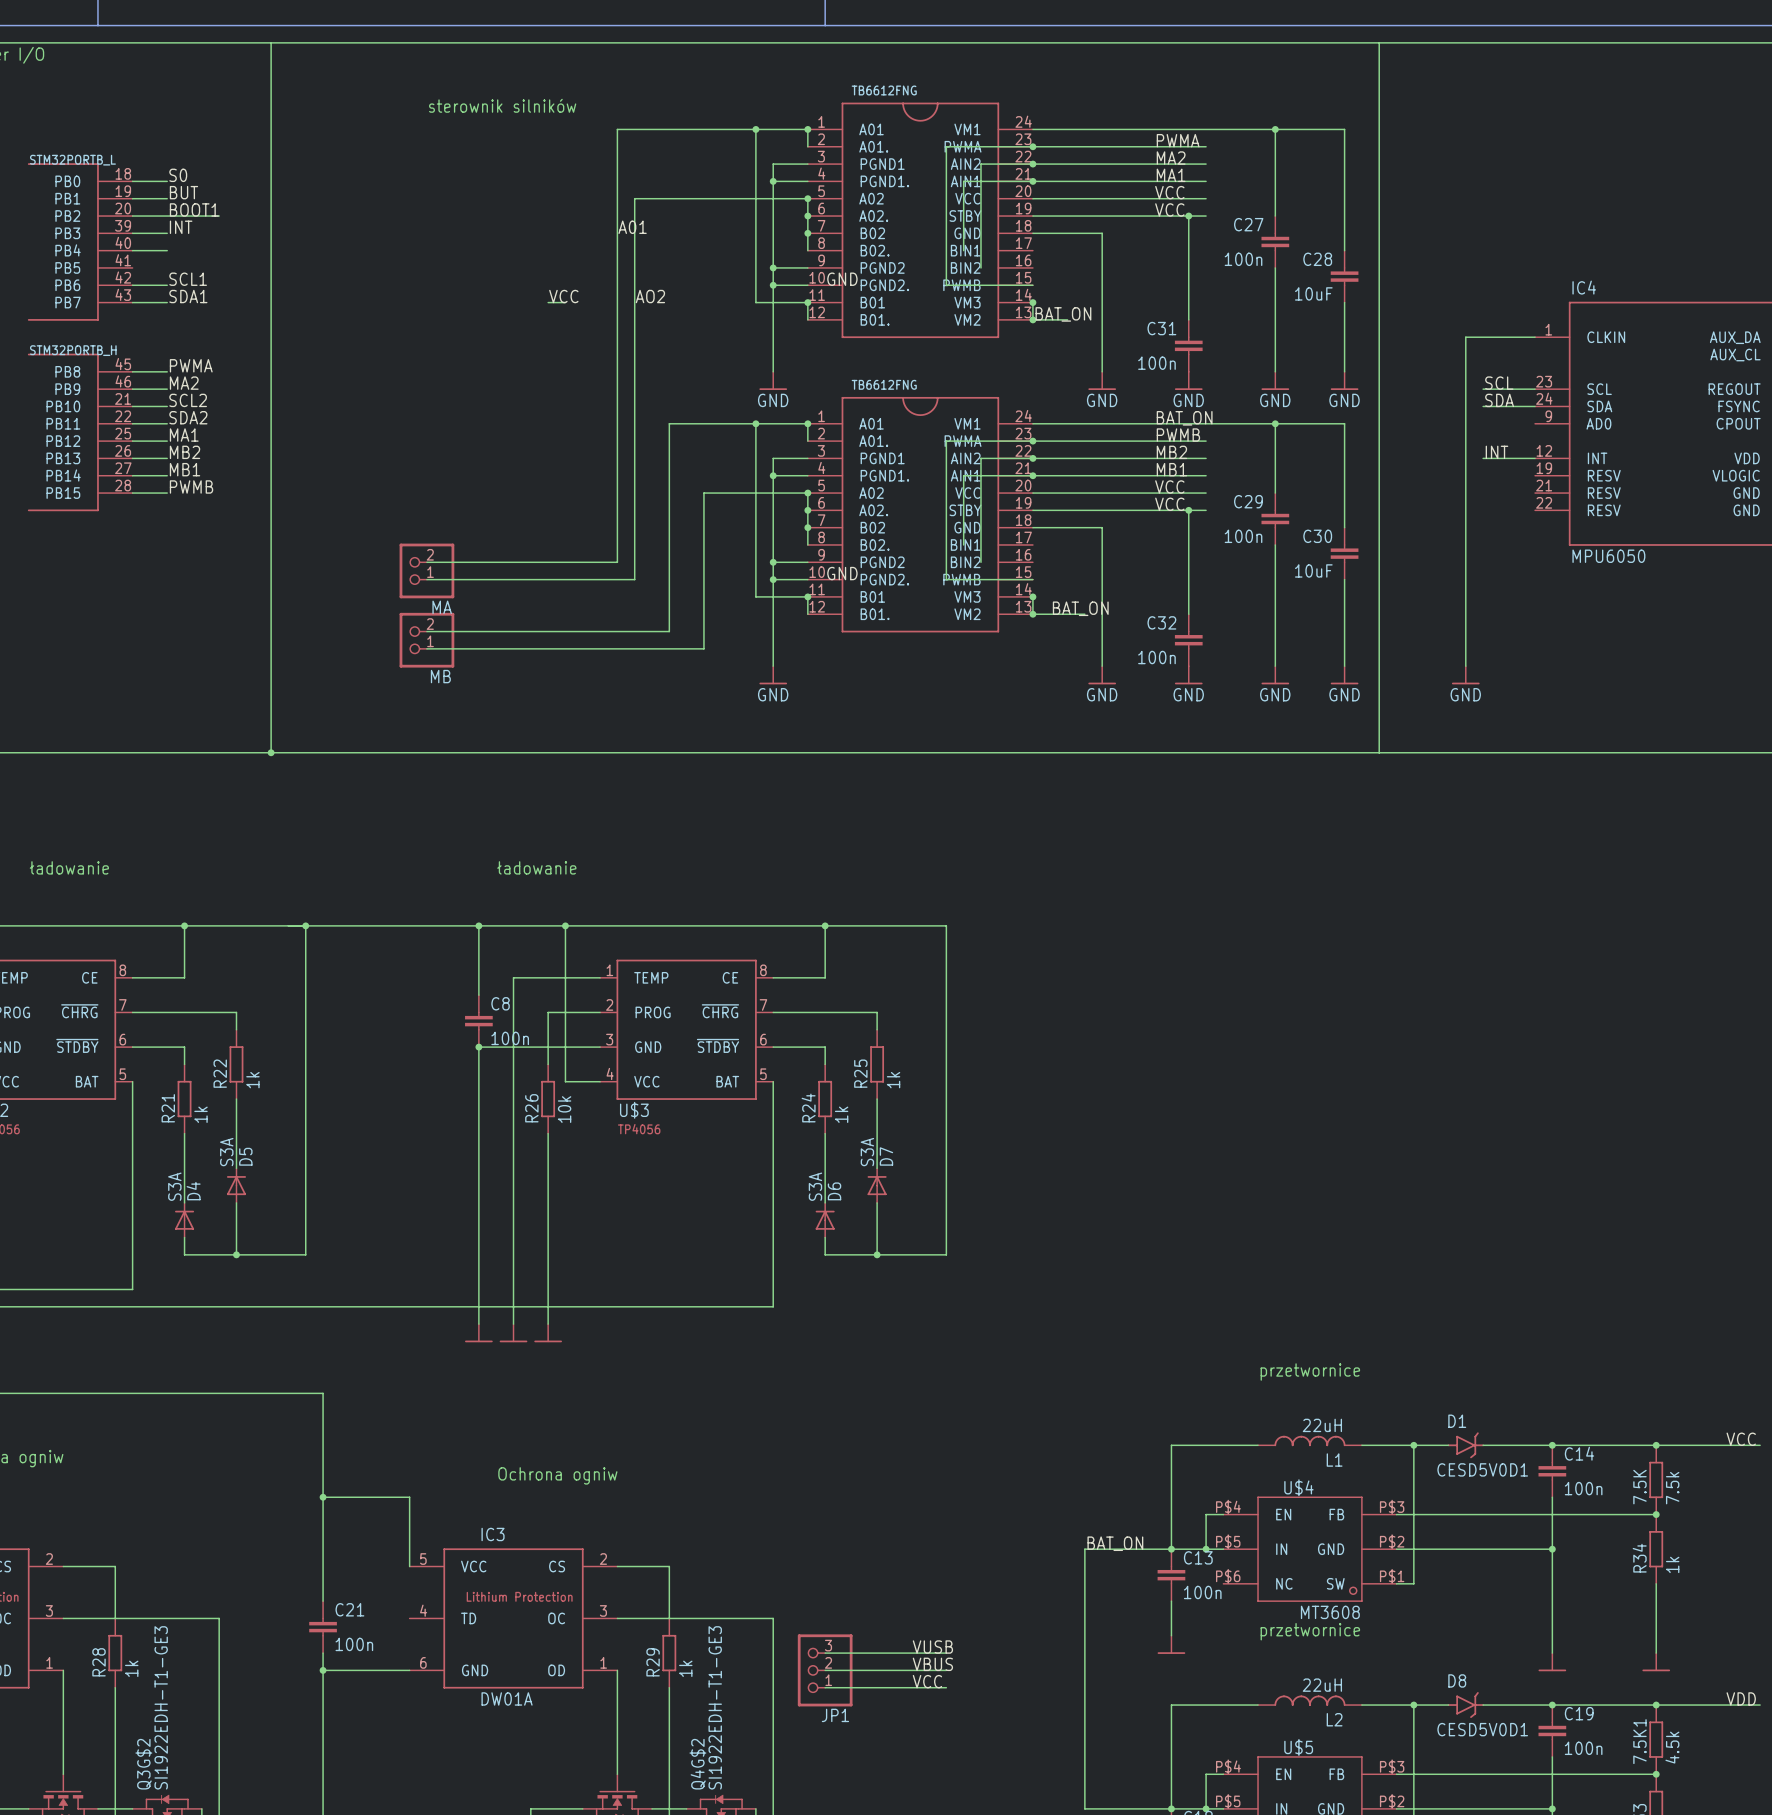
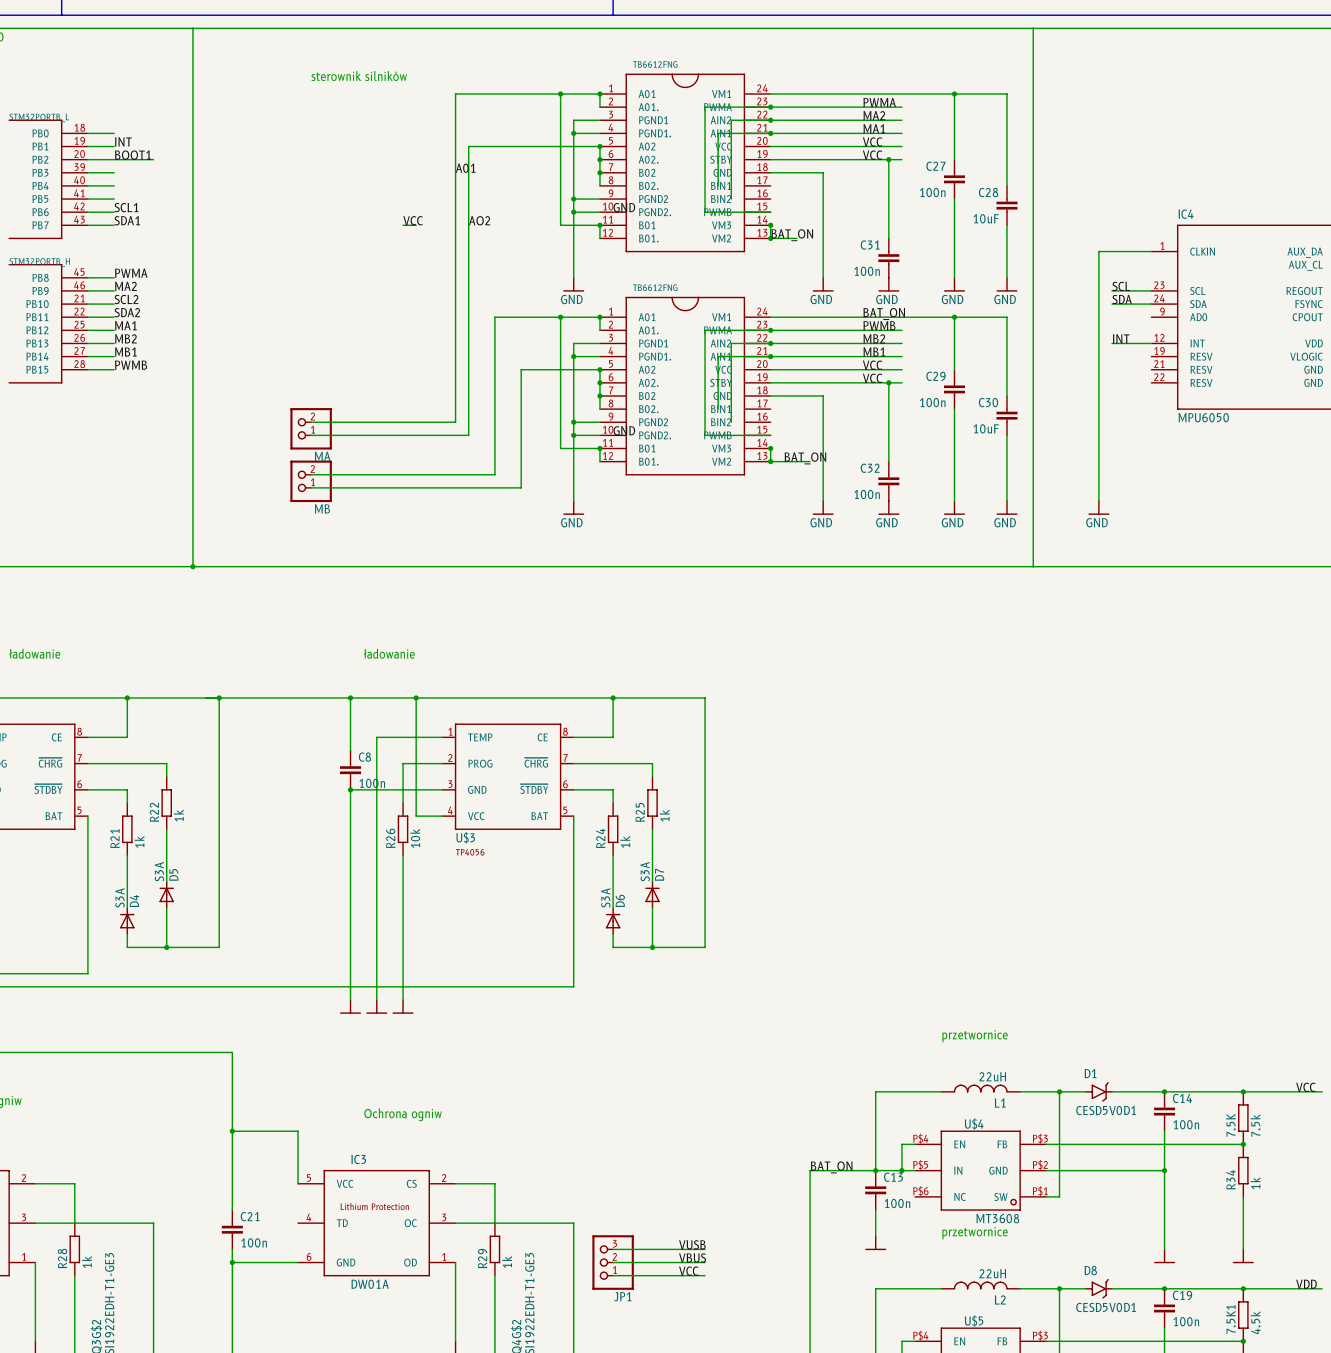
label: S0 (178, 175) -> none
label: BUT (183, 192) -> INT (123, 141)
label: INT (181, 227) -> none
wire: none -> (87, 199) (114, 199)

